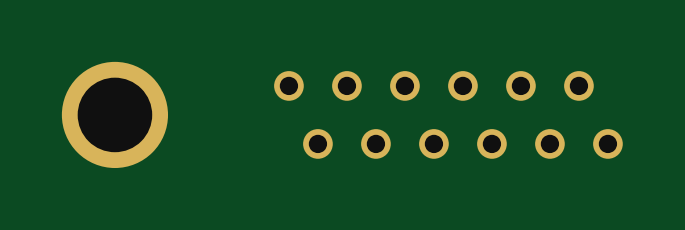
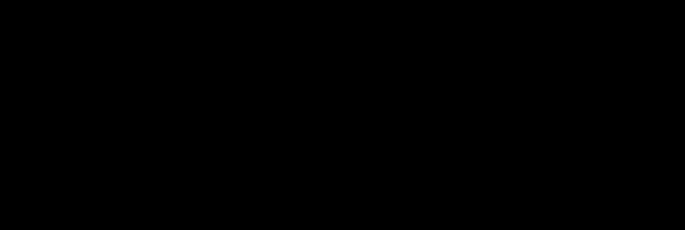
part: (114, 114) -> none
part: (448, 114) -> none

